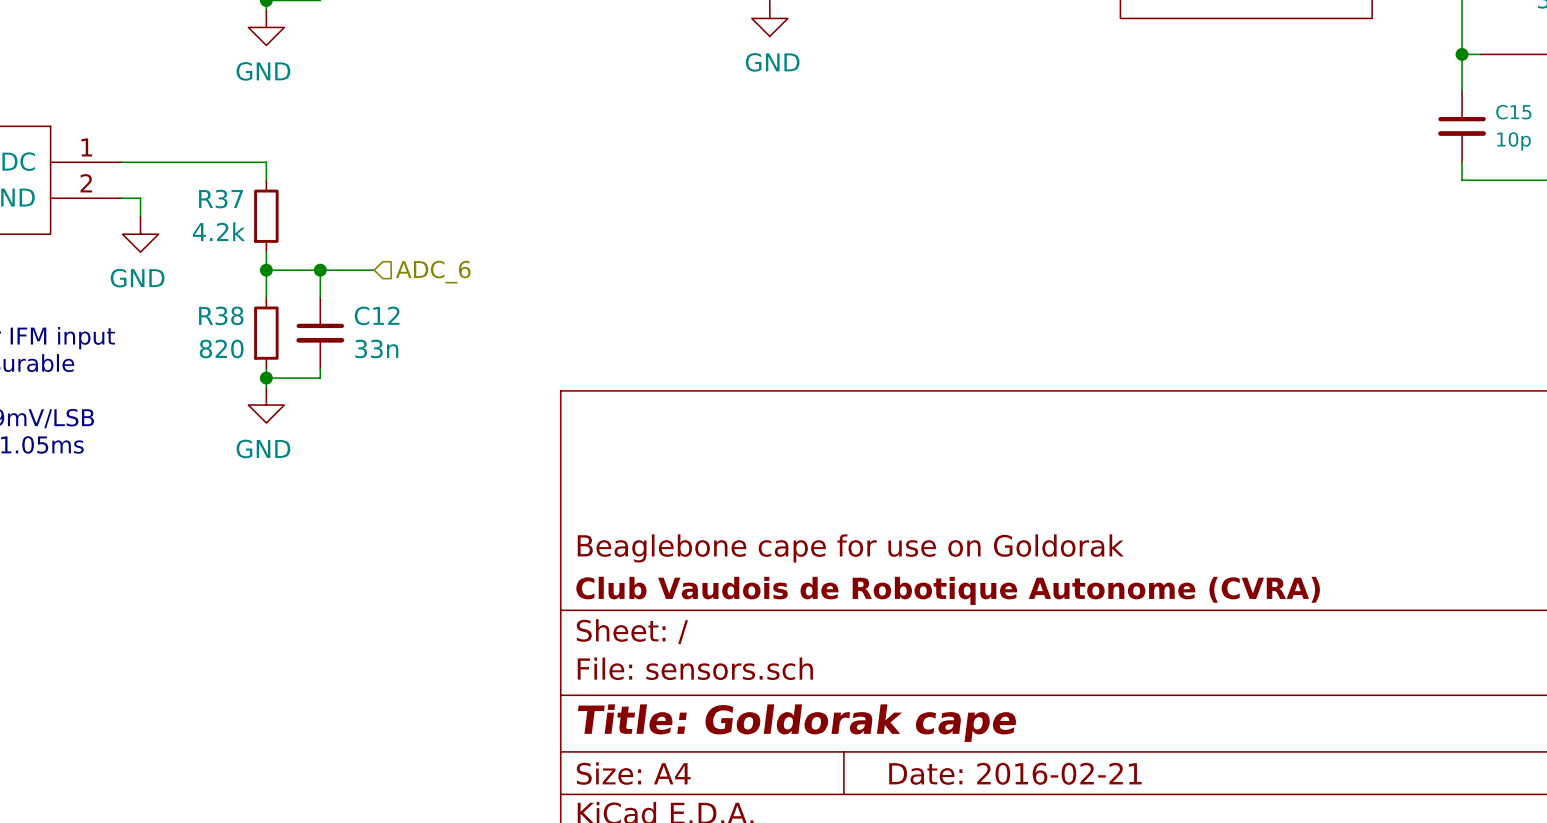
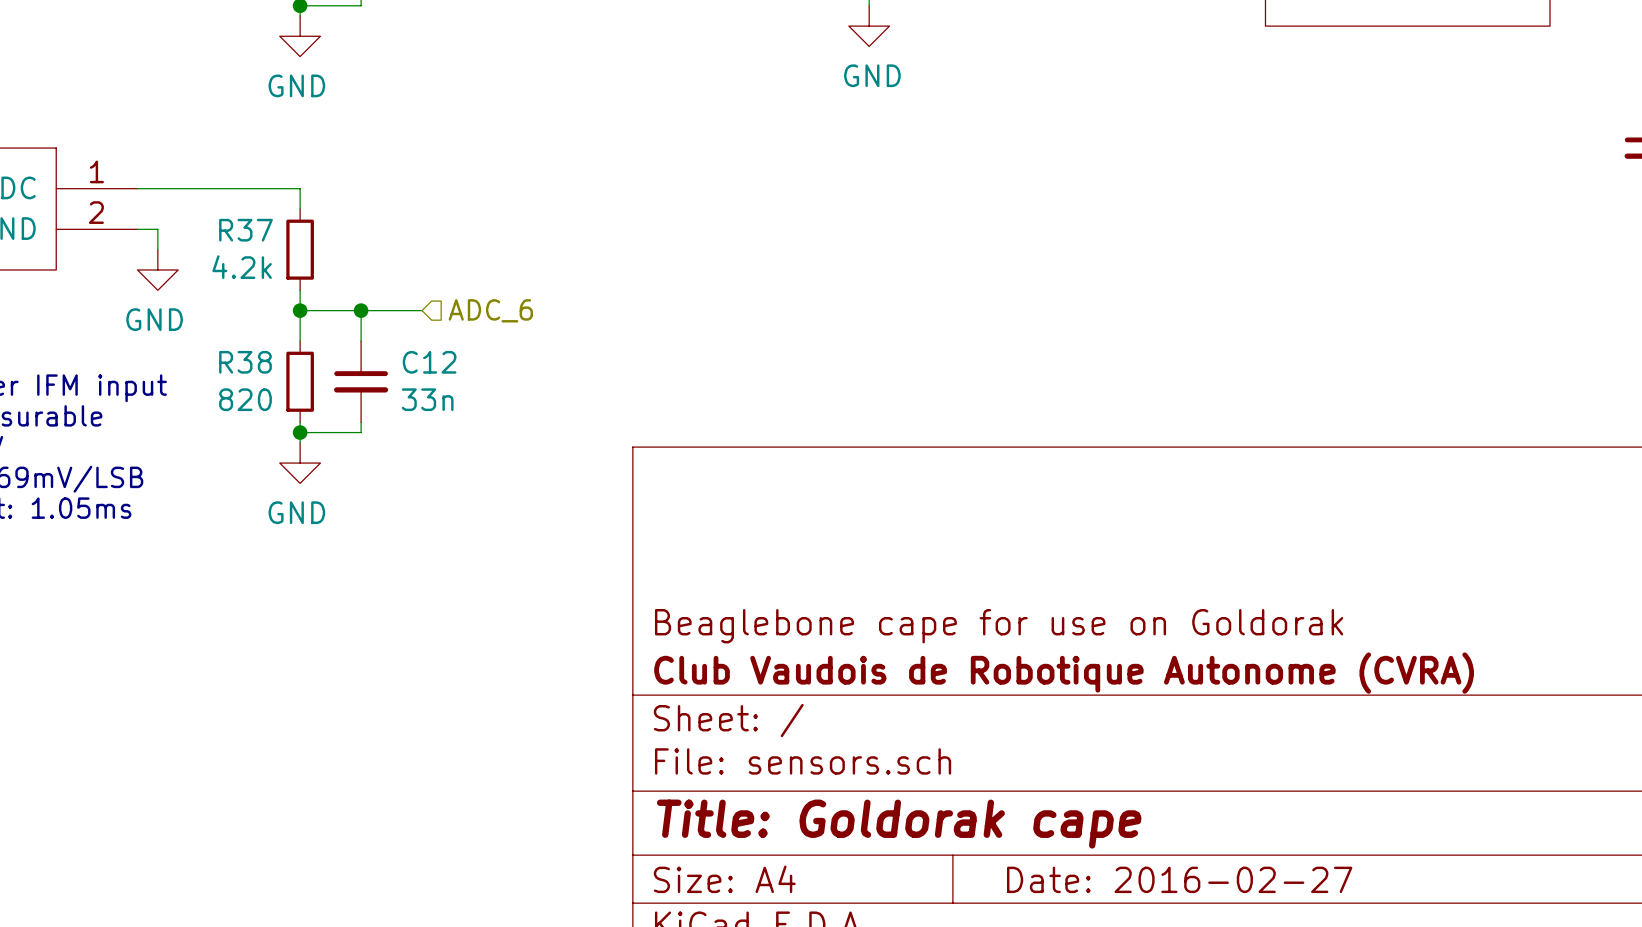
title block: Date: 2016-02-21 (1015, 773) -> Date: 2016-02-27 (1179, 879)

